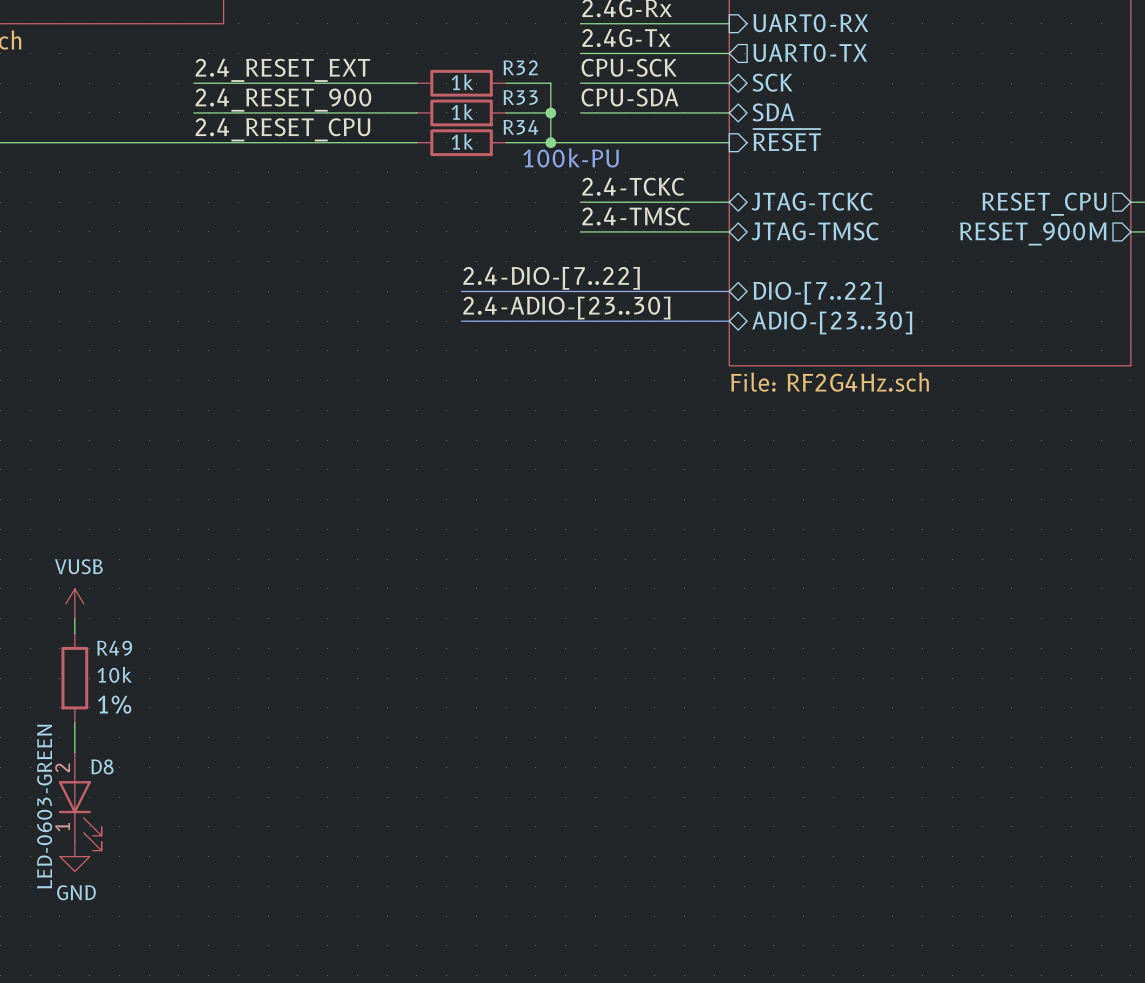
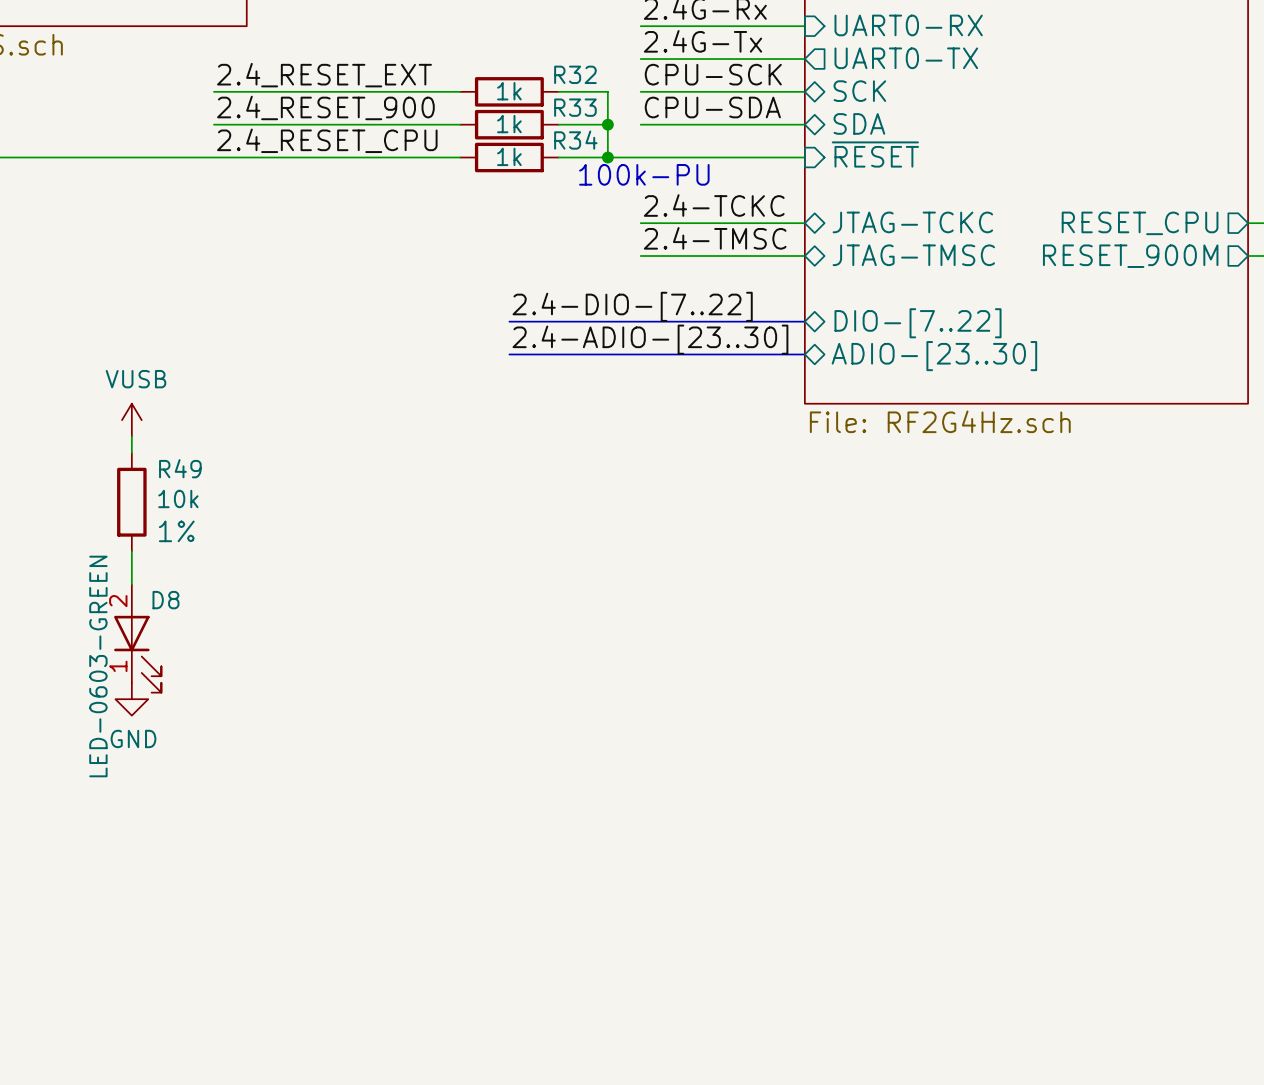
power symbol position: VUSB (74, 603) -> VUSB (131, 420)
wire: (74, 618) (74, 633) -> (131, 436) (131, 452)
R49 position: (74, 678) -> (131, 502)
wire: (74, 722) (74, 752) -> (131, 551) (131, 584)
D8 position: (80, 801) -> (137, 638)
power symbol position: GND (74, 856) -> GND (131, 699)

